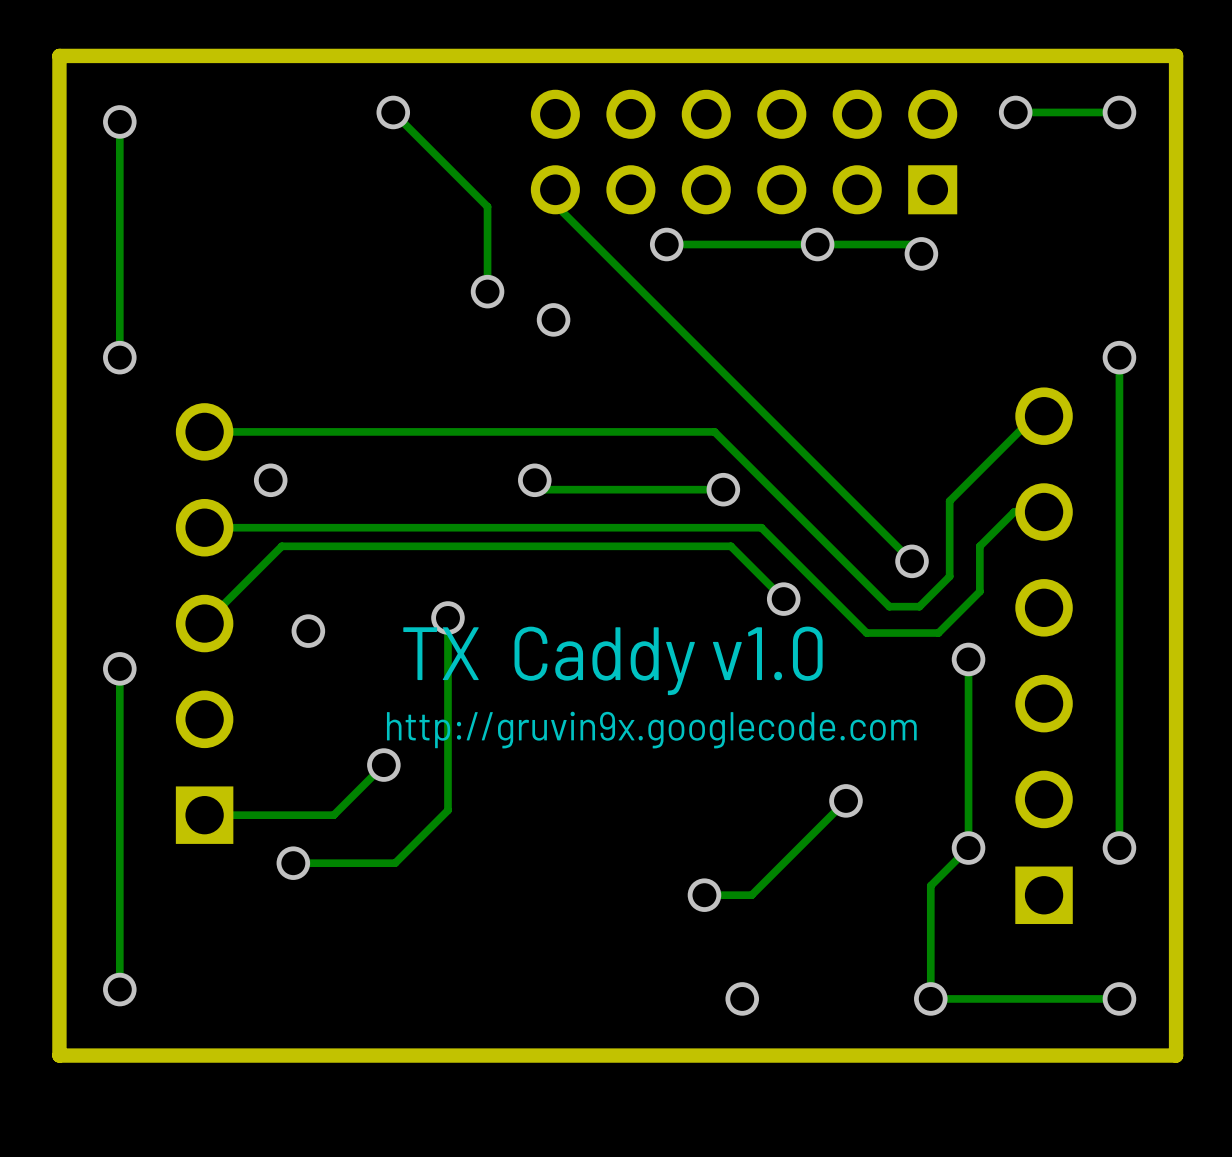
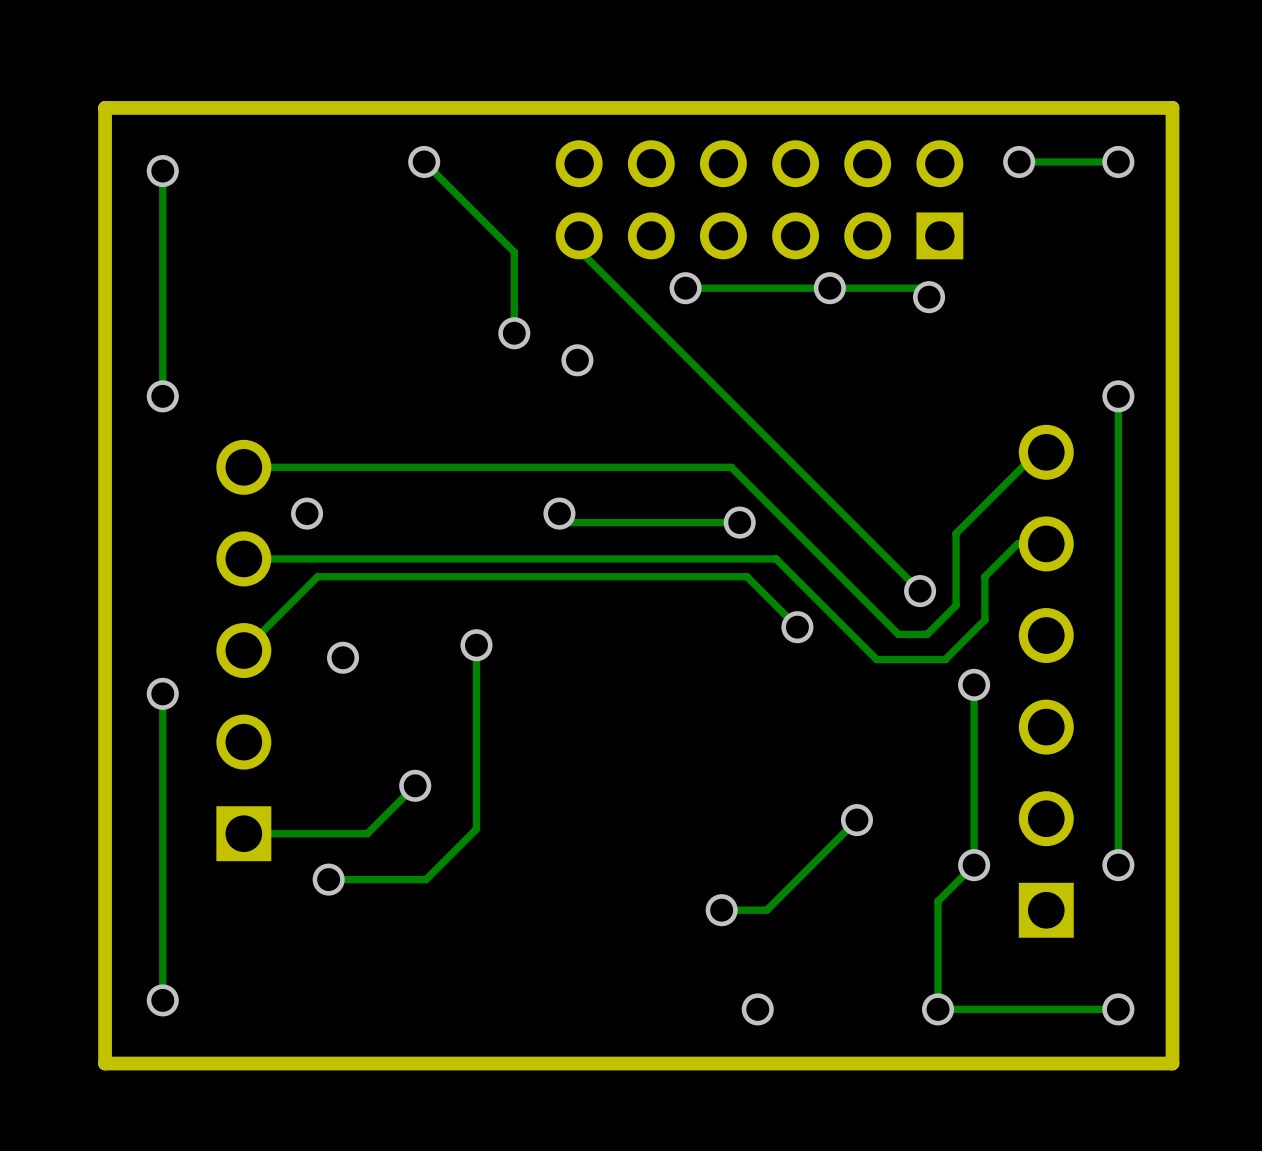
text: TX Caddy v1.0 (612, 660) -> none
text: http://gruvin9x.googlecode.com (651, 730) -> none

